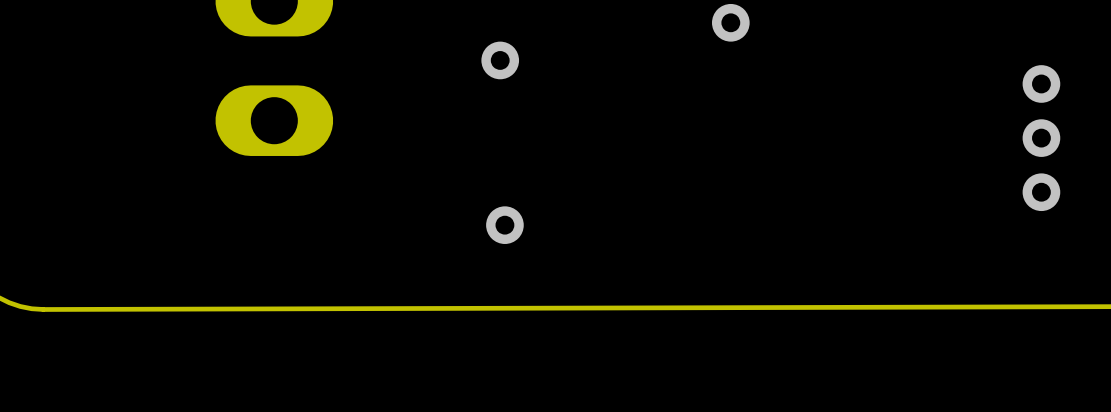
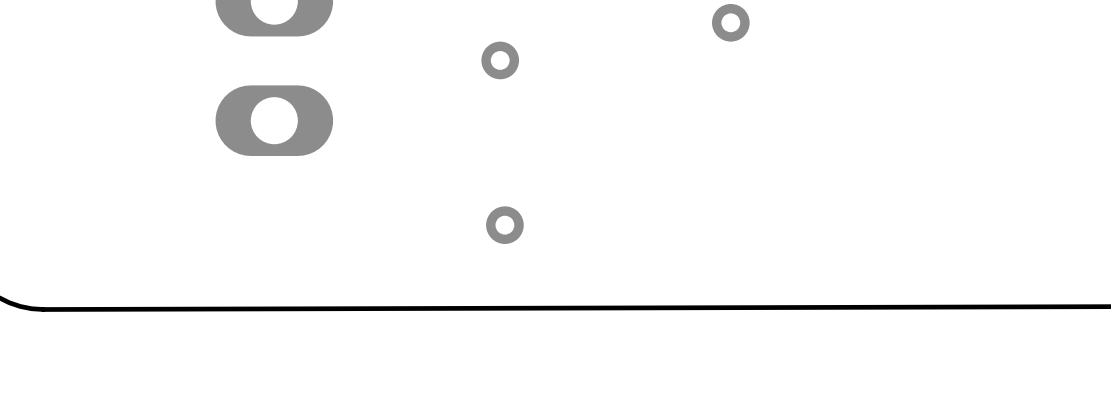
via: (1041, 83) -> none
via: (1041, 138) -> none
via: (1041, 192) -> none

